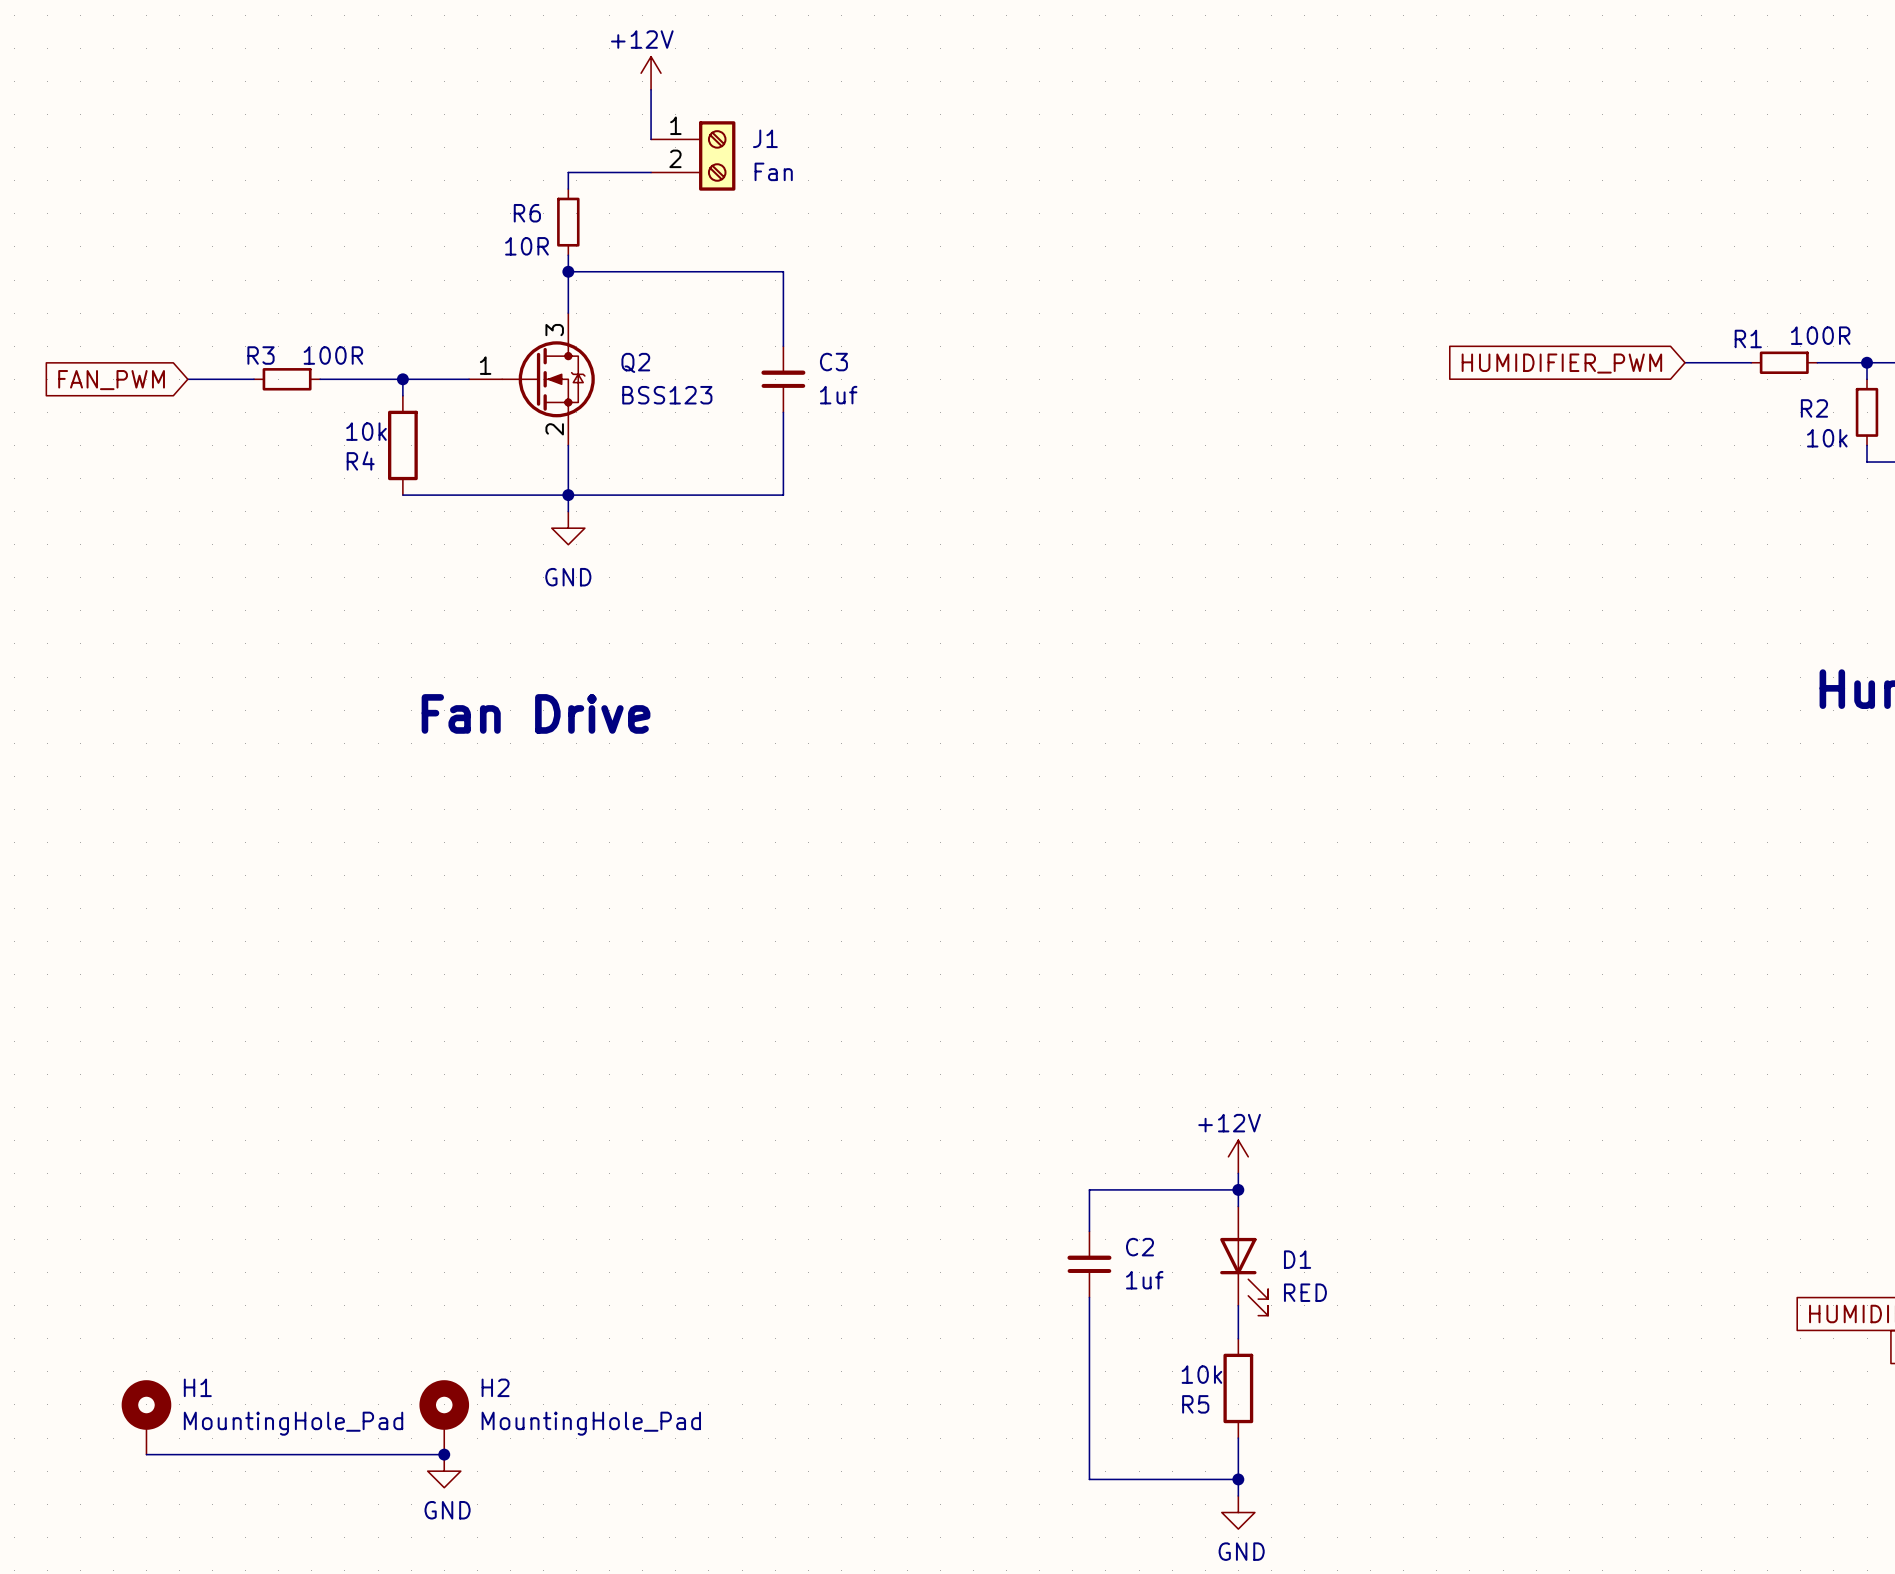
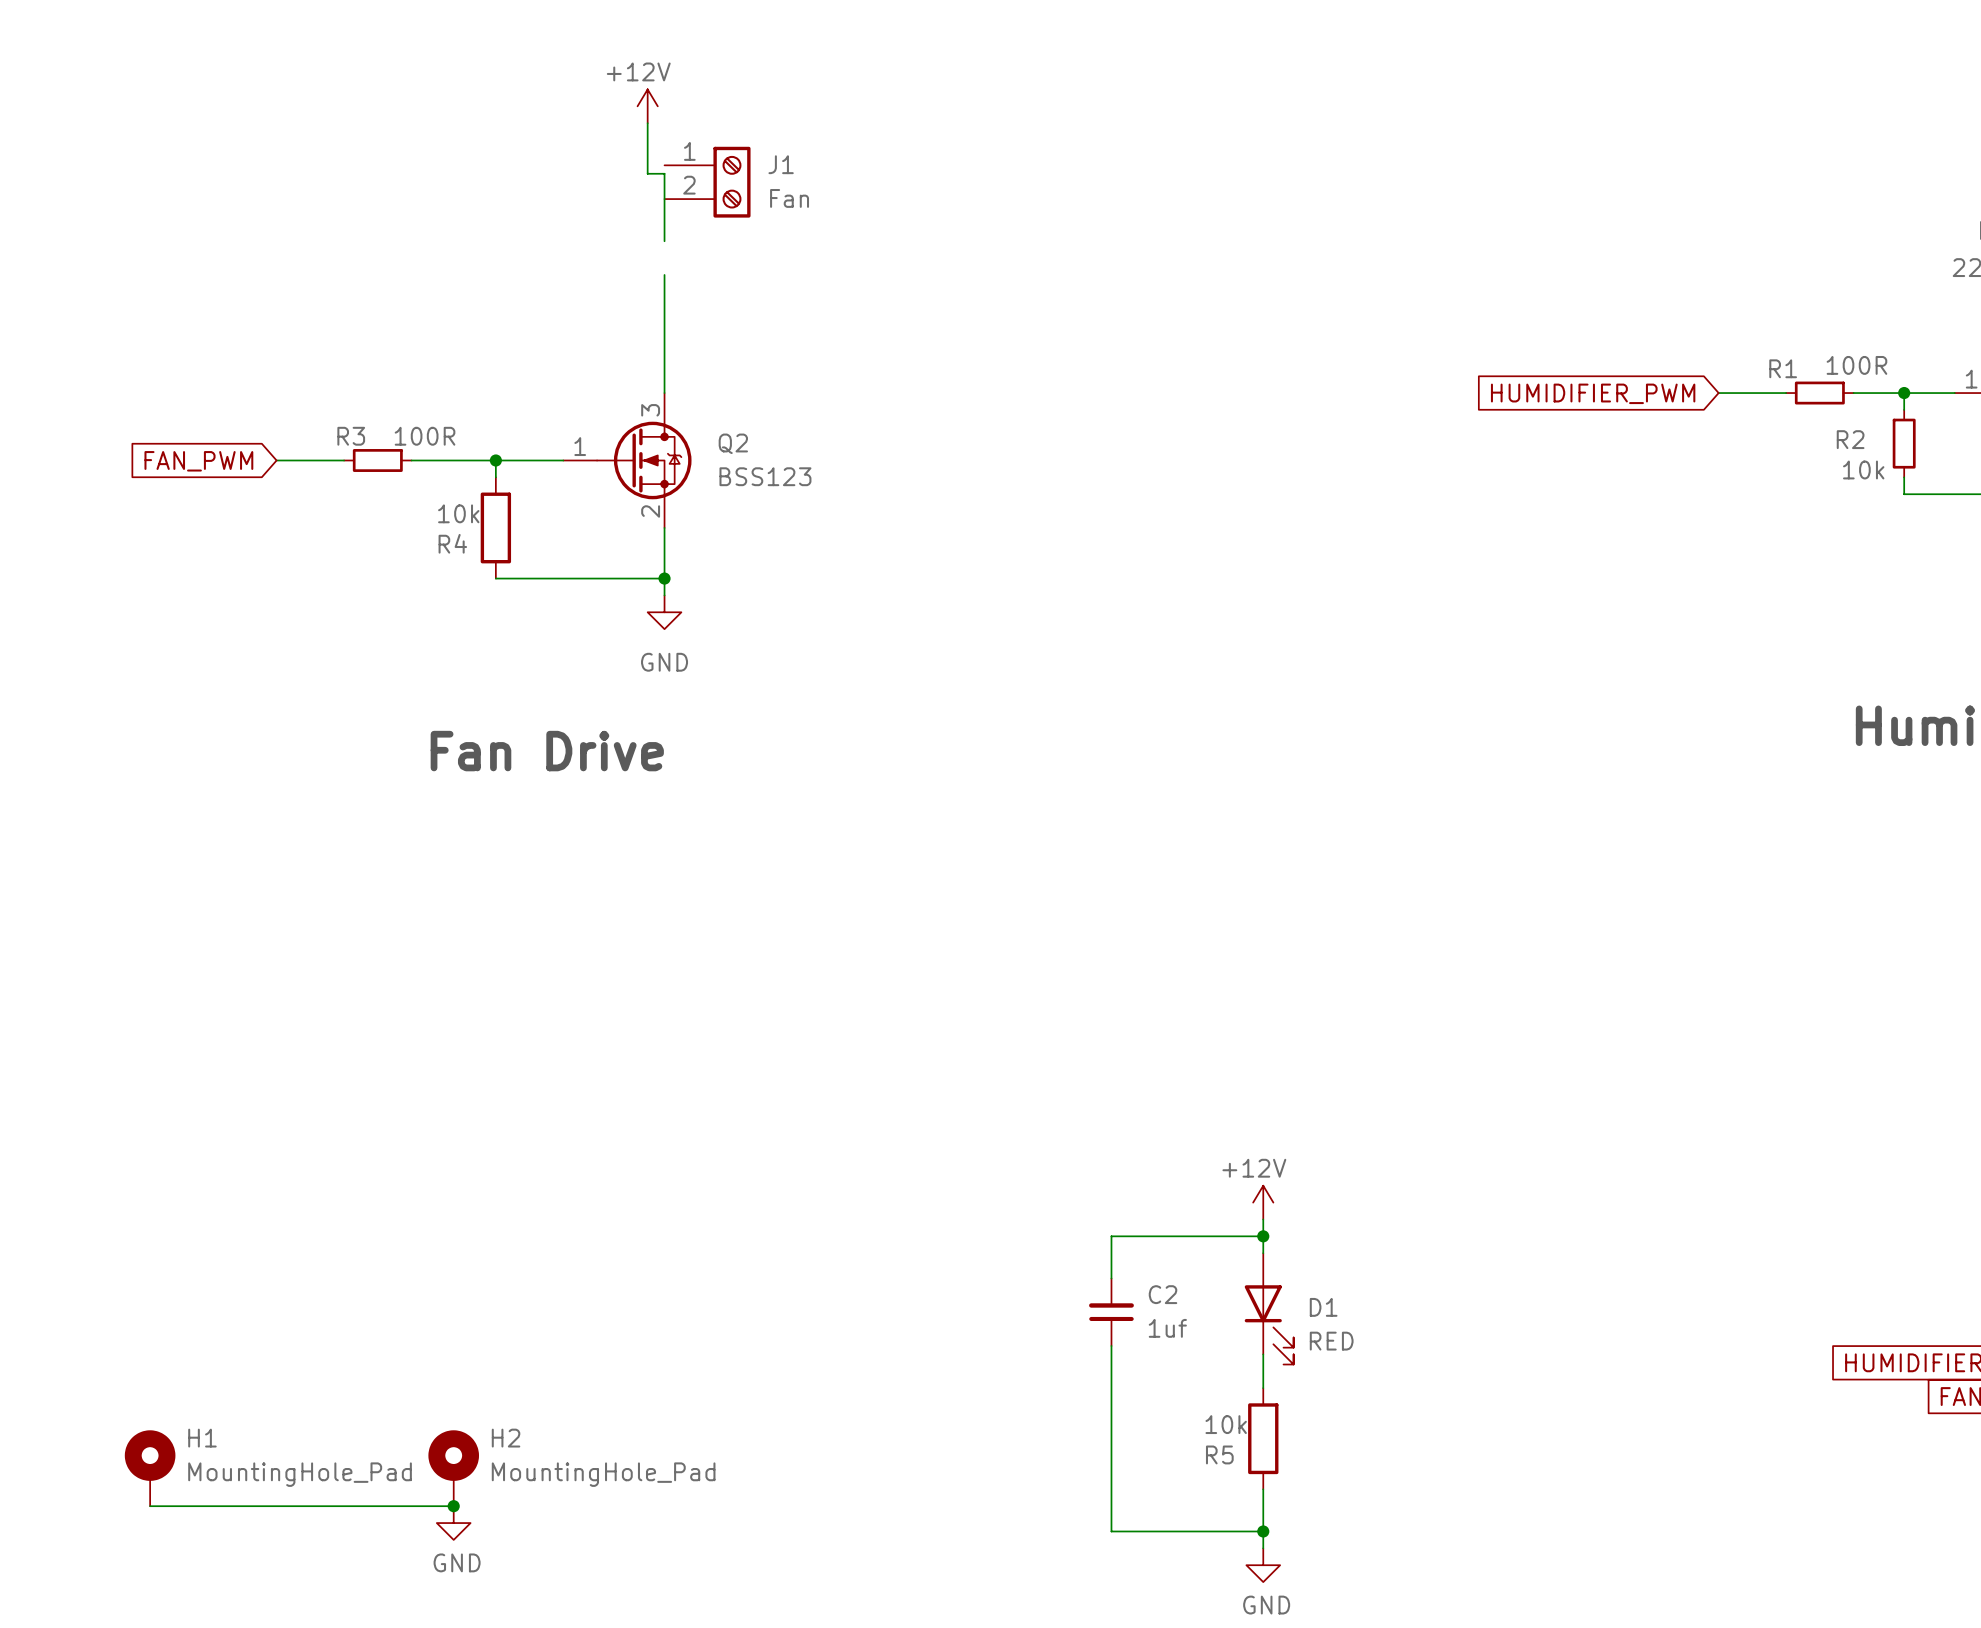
power symbol position: +12V (651, 73) -> +12V (647, 106)
wire: (651, 89) (651, 139) -> none
wire: none -> (647, 123) (647, 173) (664, 173) (664, 241)
wire: (651, 172) (568, 172) (568, 189) -> none
R6: 10R (568, 222) -> none
wire: none -> (664, 274) (664, 393)
wire: (568, 255) (568, 313) -> none
wire: (568, 271) (783, 271) (783, 346) -> none
junction: (568, 271) -> none
wire: (187, 379) (254, 379) -> (276, 460) (344, 460)
R3 position: (287, 379) -> (377, 460)
wire: (320, 379) (469, 379) -> (411, 460) (563, 460)
wire: (402, 379) (402, 395) -> (495, 460) (495, 477)
junction: (402, 379) -> none
Q2 position: (531, 379) -> (627, 460)
C3: 1uf (783, 379) -> none
global label position: FAN_PWM (111, 380) -> FAN_PWM (198, 461)
wire: (783, 412) (783, 495) (402, 495) -> none
junction: none -> (495, 460)
R4 position: (402, 445) -> (495, 527)
wire: (568, 445) (568, 511) -> (664, 527) (664, 595)
junction: (568, 495) -> none
power symbol position: GND (568, 528) -> GND (664, 612)
wire: none -> (495, 578) (664, 578)
junction: none -> (664, 578)

